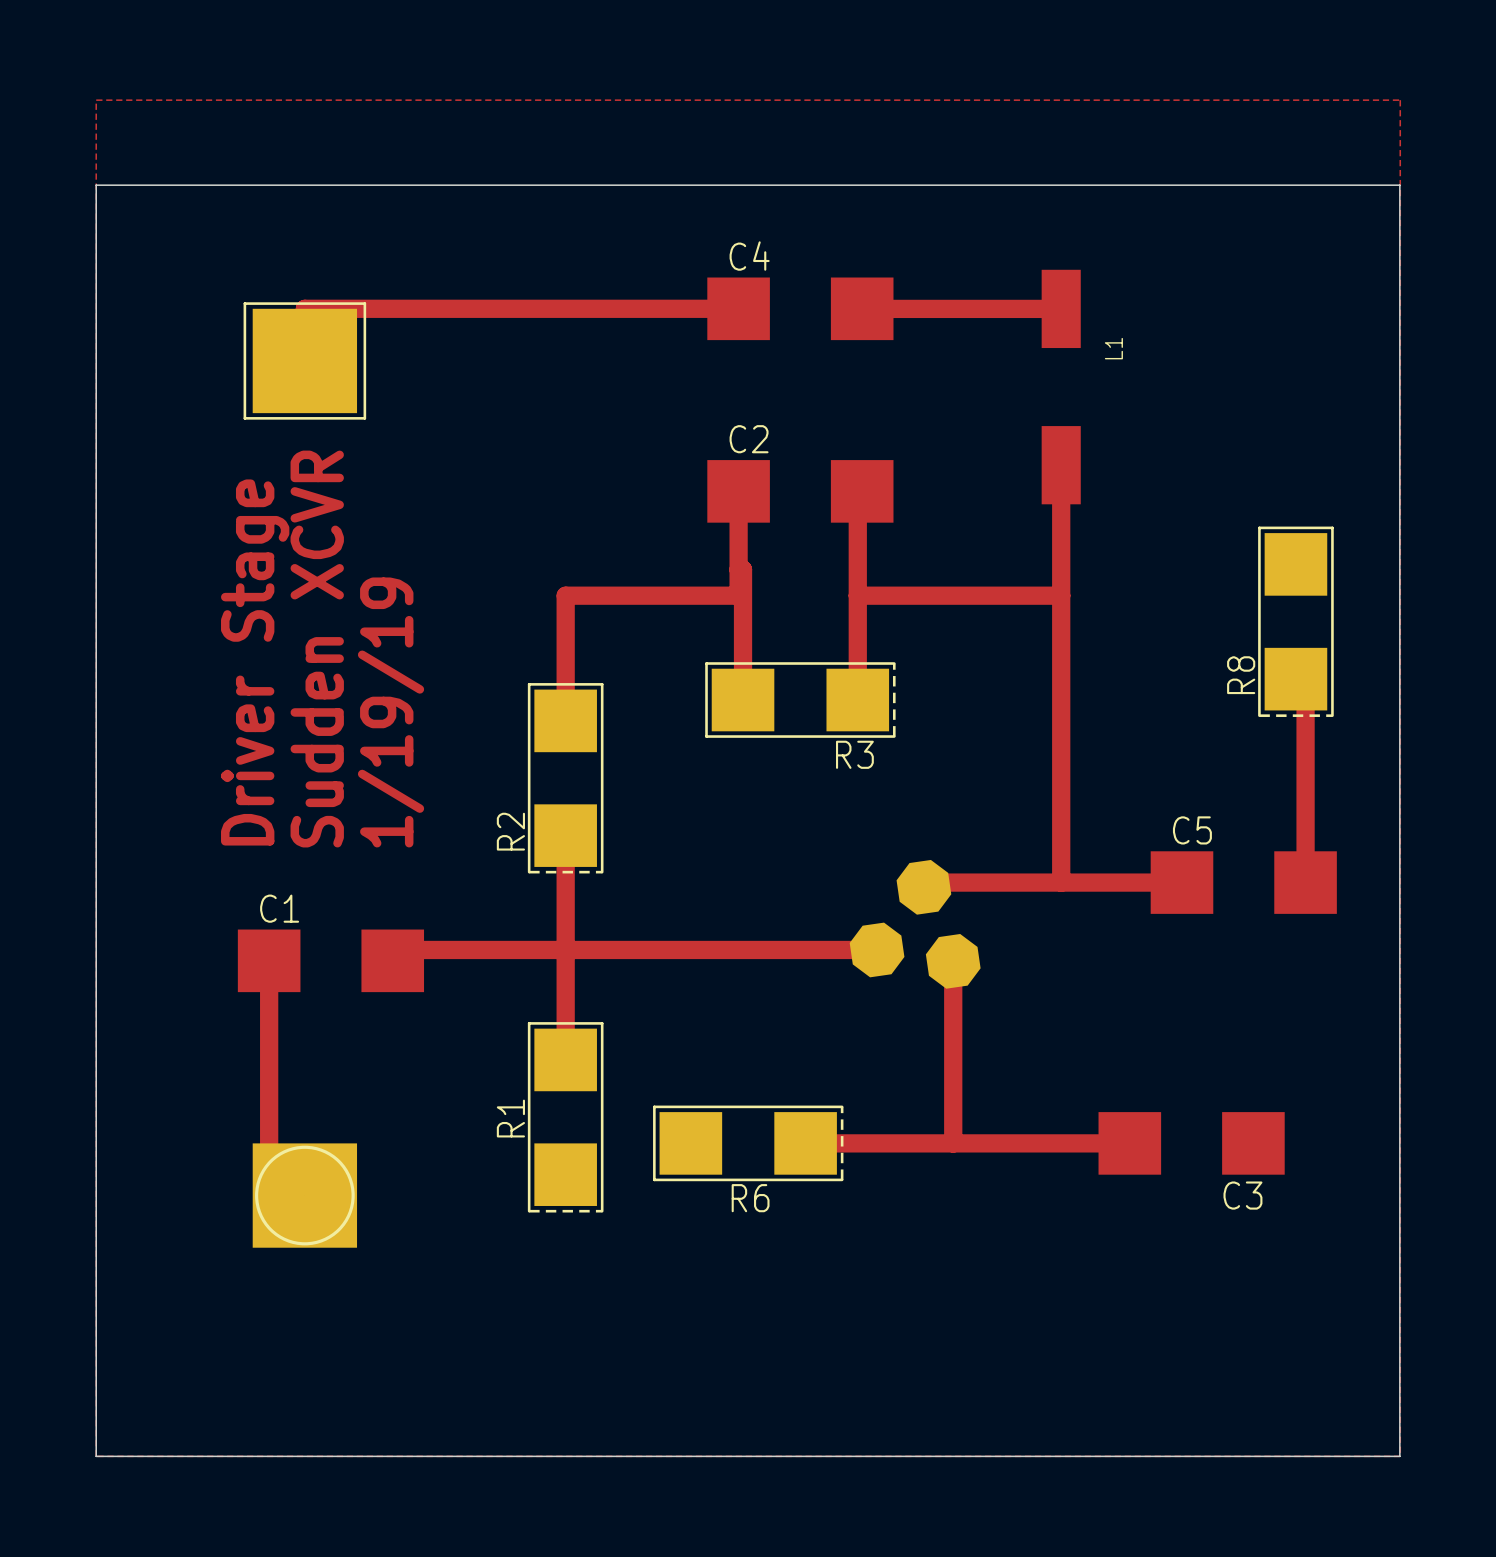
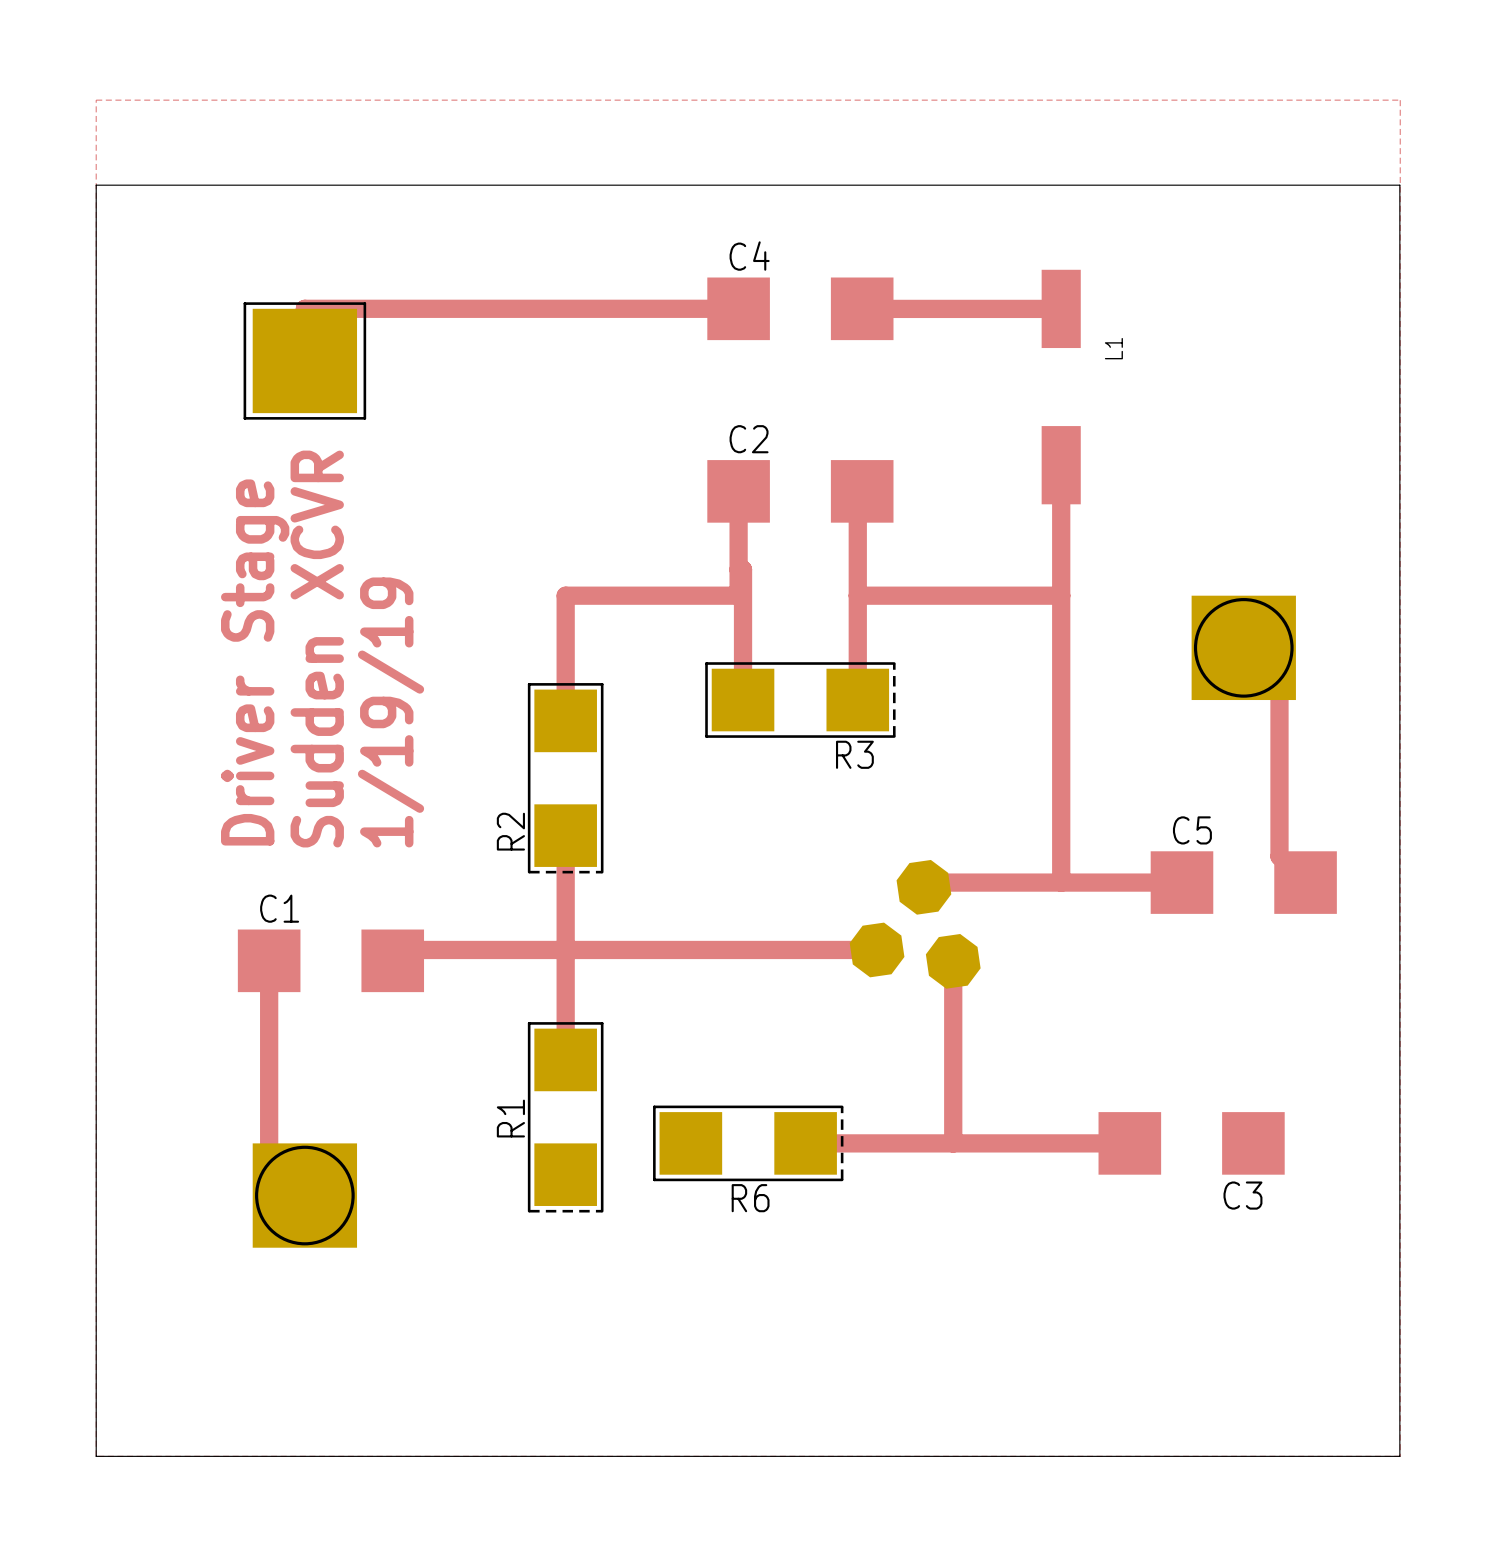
R8: (1295, 621) -> none
part: none -> (1243, 647)
track: (1295, 673) (1305, 673) (1305, 882) -> (1243, 647) (1279, 683) (1279, 856) (1305, 882)

